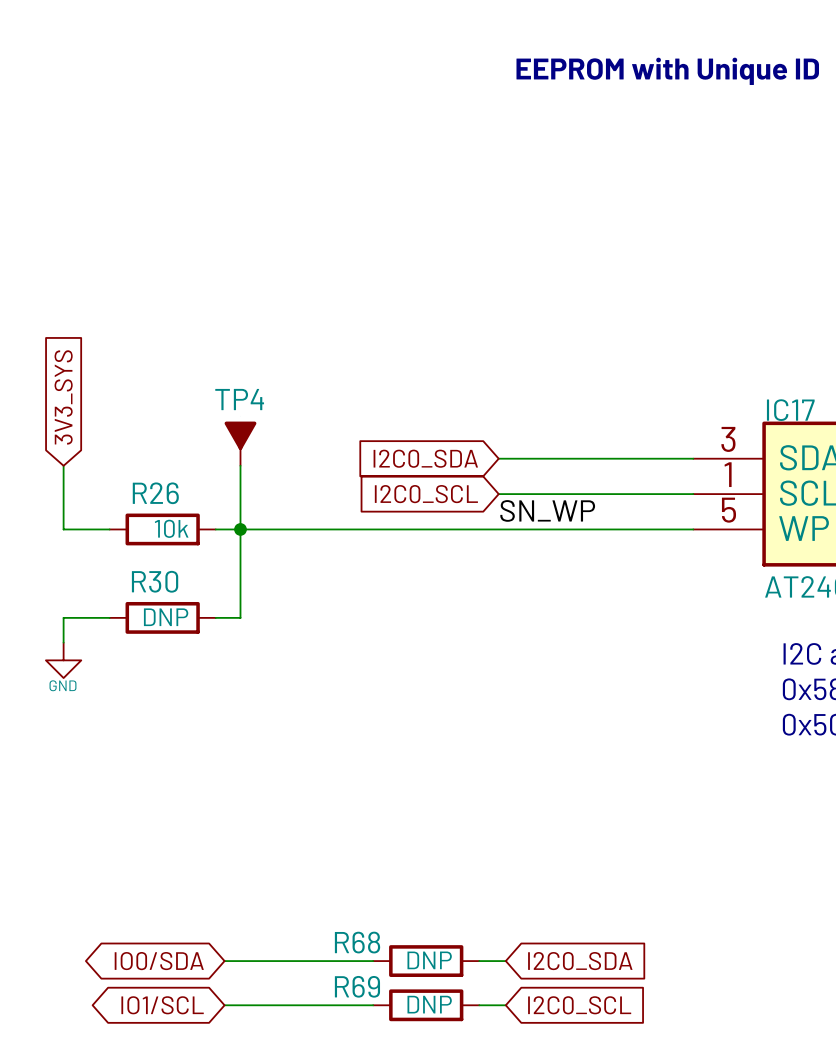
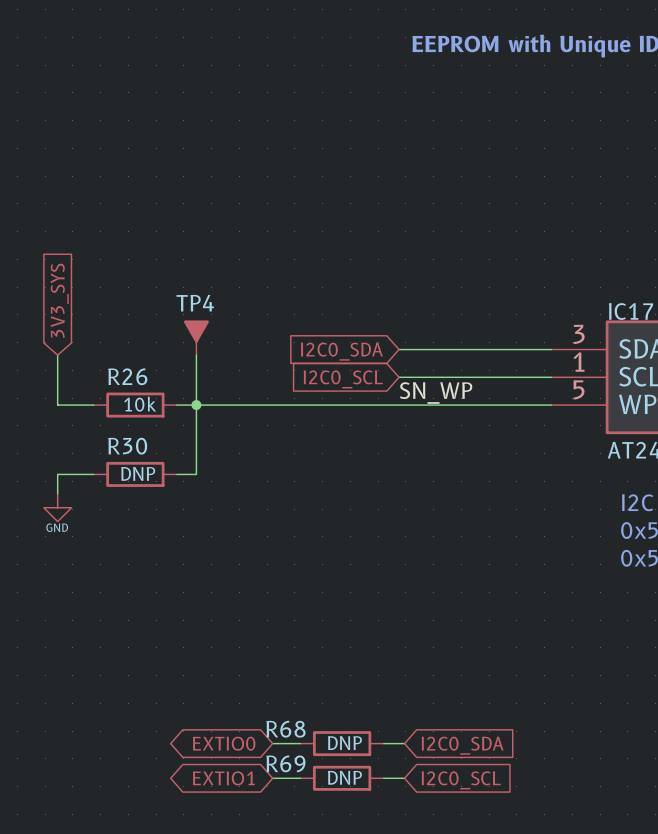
global label: IO0/SDA (159, 961) -> none
wire: (224, 961) (337, 961) -> none
global label: none -> EXTIO0 (224, 743)
global label: IO1/SCL (162, 1005) -> none
wire: (224, 1005) (337, 1005) -> none
global label: none -> EXTIO1 (223, 778)

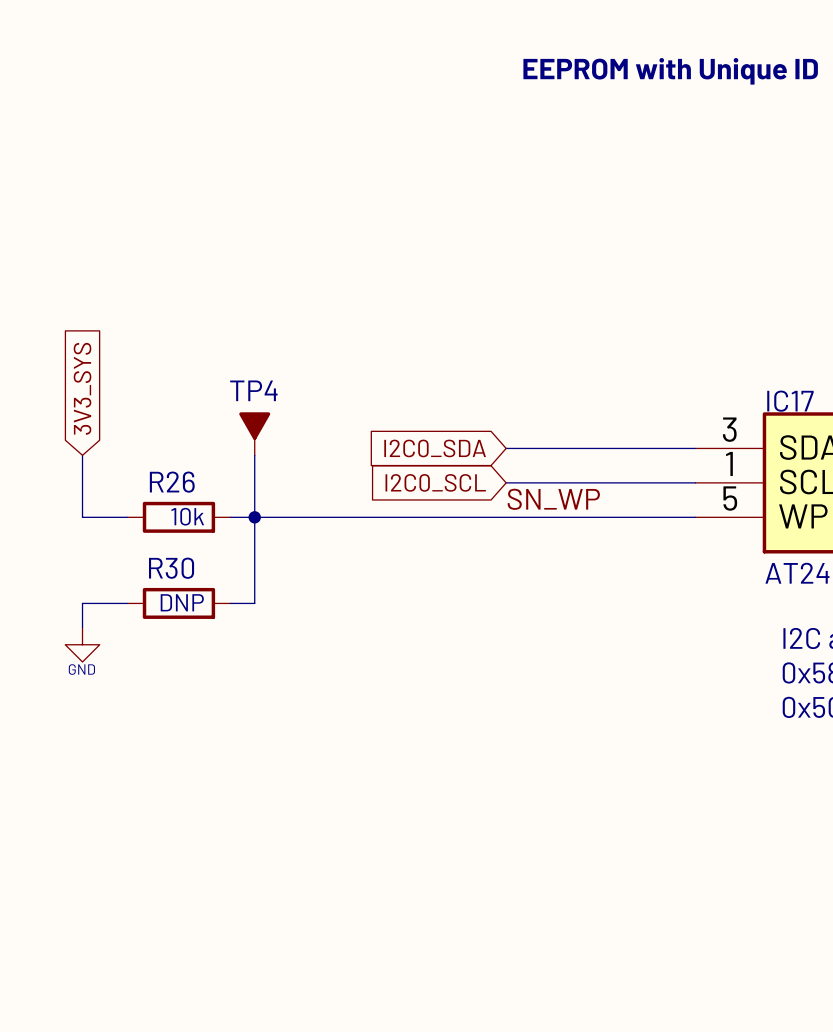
global label: EXTIO0 (224, 743) -> none
wire: (272, 743) (300, 743) -> none
R68: (342, 743) -> none
wire: (383, 743) (404, 743) -> none
global label: I2C0_SDA (462, 745) -> none
global label: EXTIO1 (223, 778) -> none
wire: (272, 778) (300, 778) -> none
R69: (342, 778) -> none
wire: (383, 778) (404, 778) -> none
global label: I2C0_SCL (461, 780) -> none

